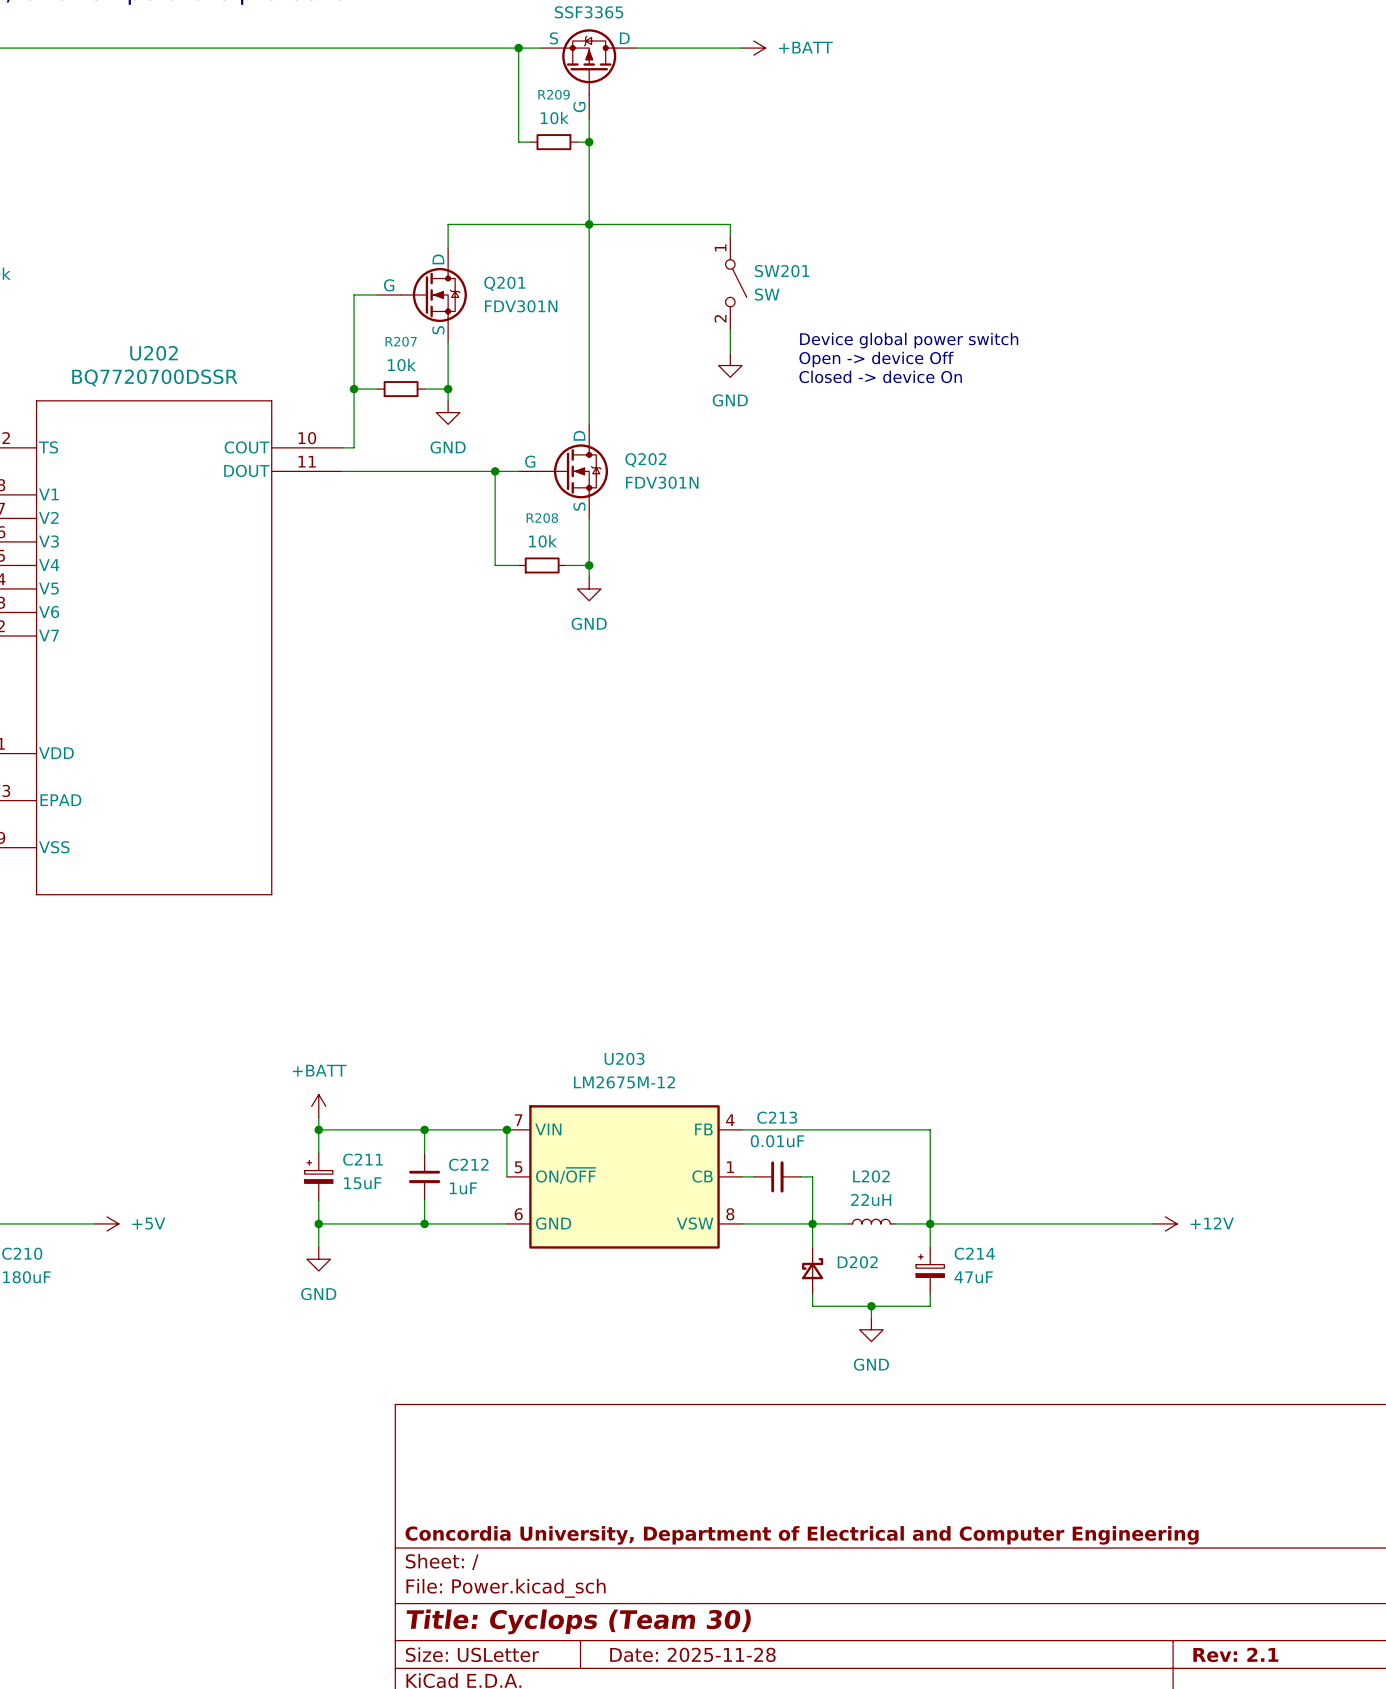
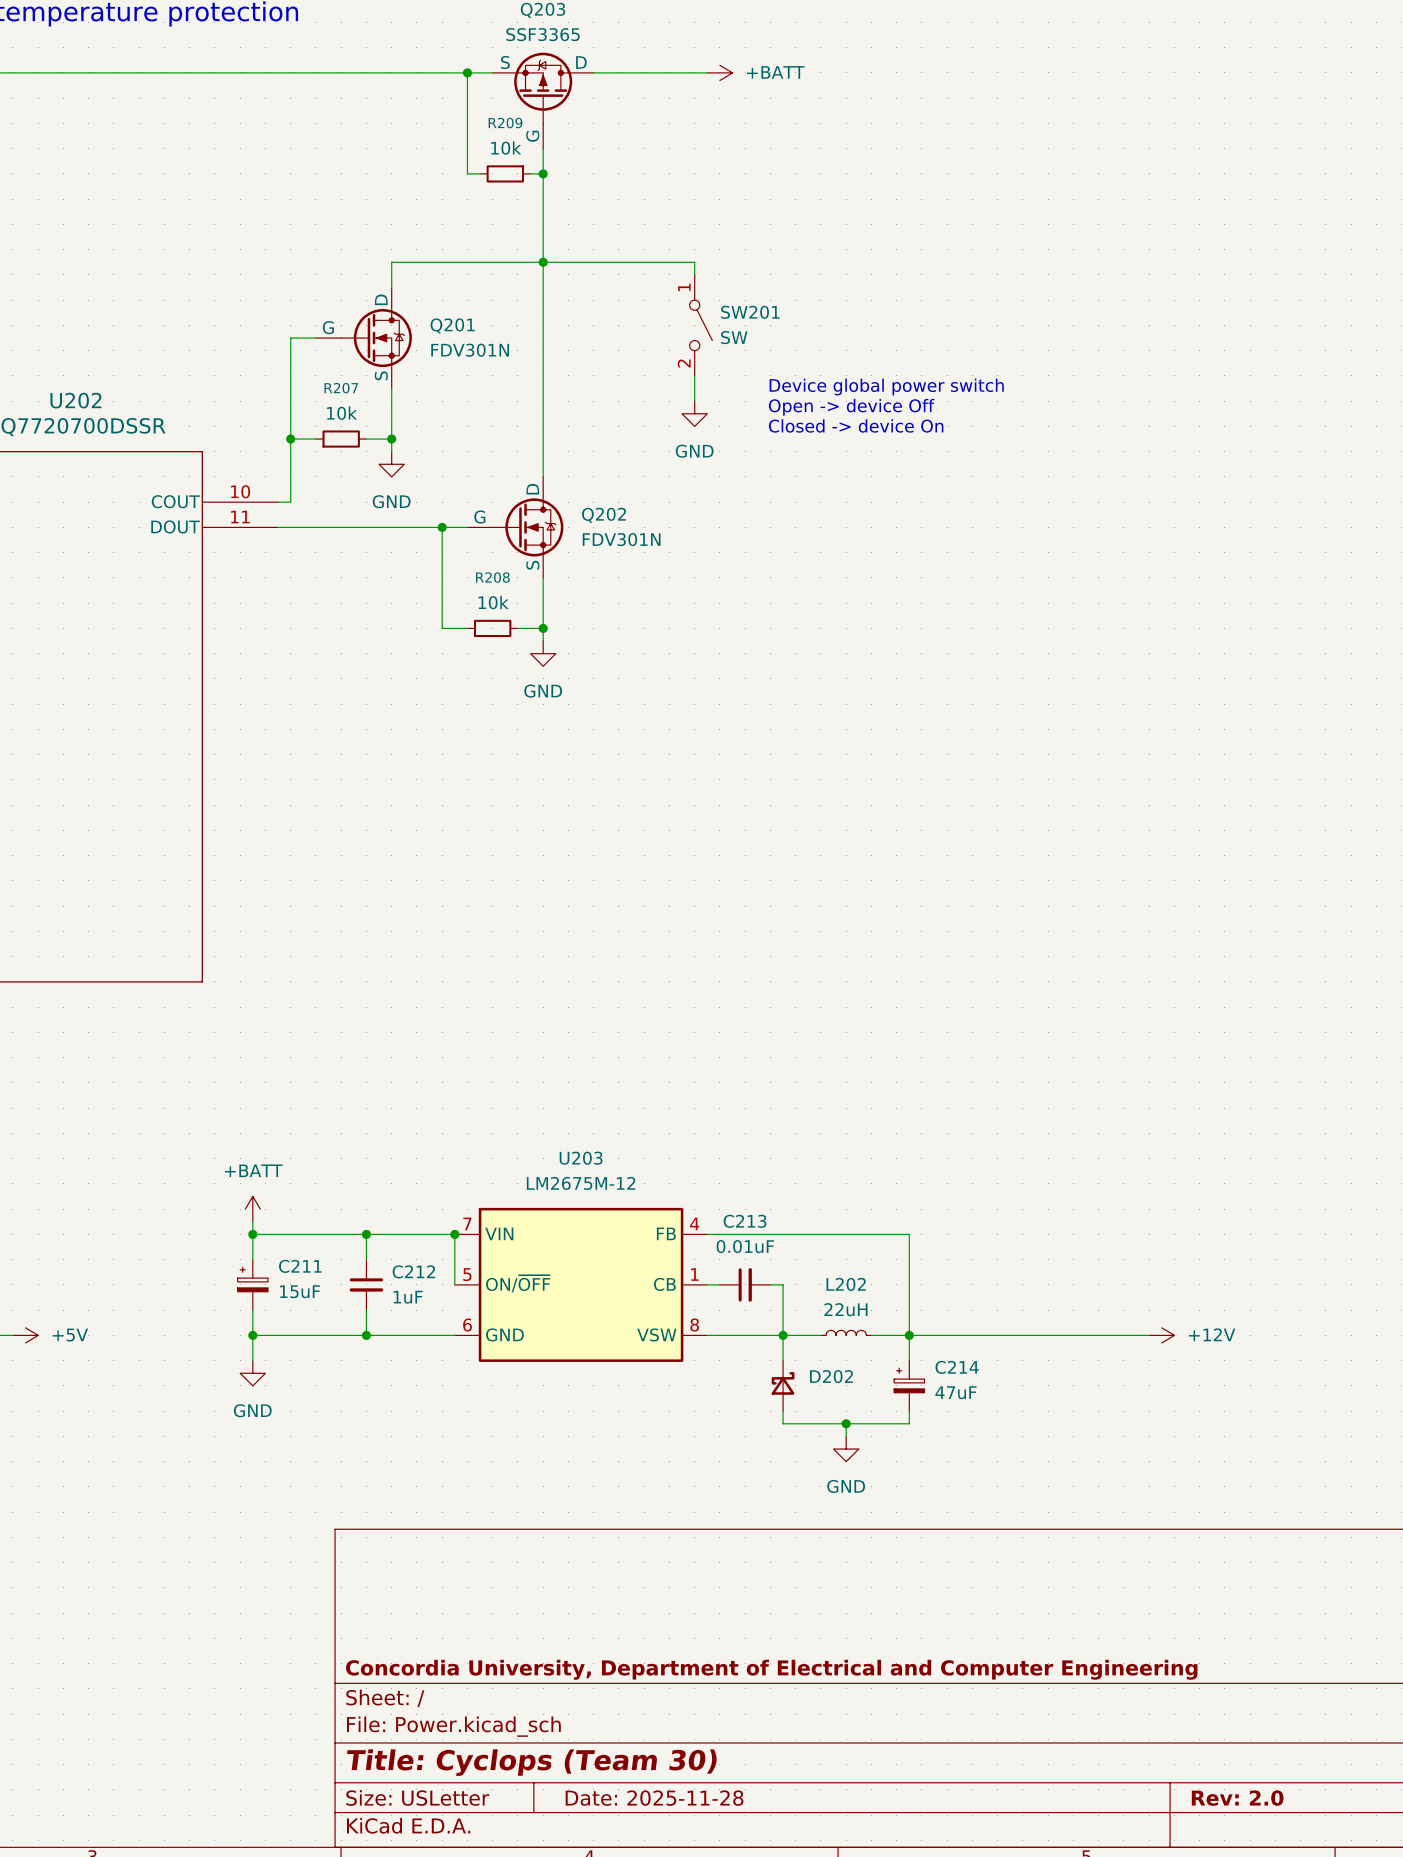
title block: Rev: 2.1 (1235, 1654) -> Rev: 2.0 (1237, 1798)

